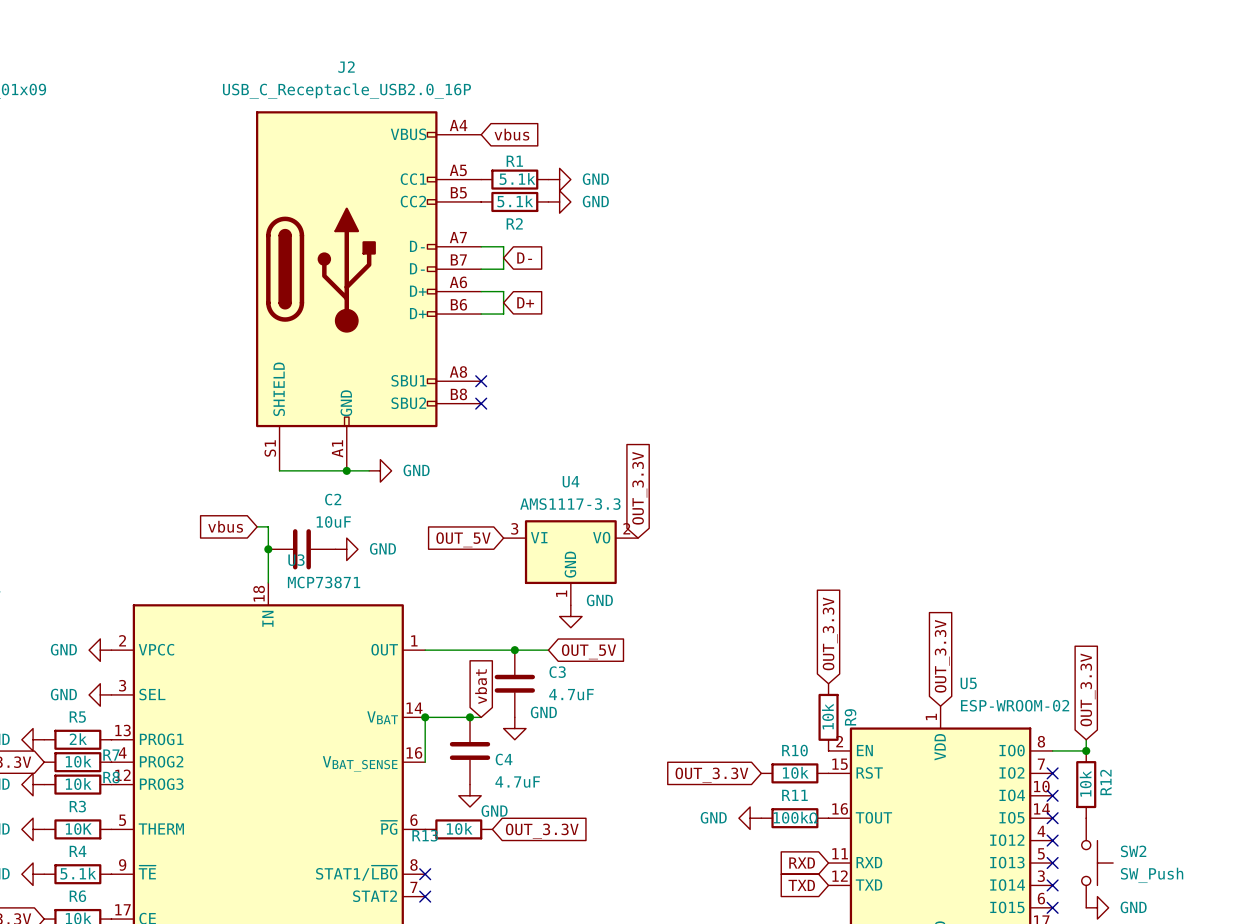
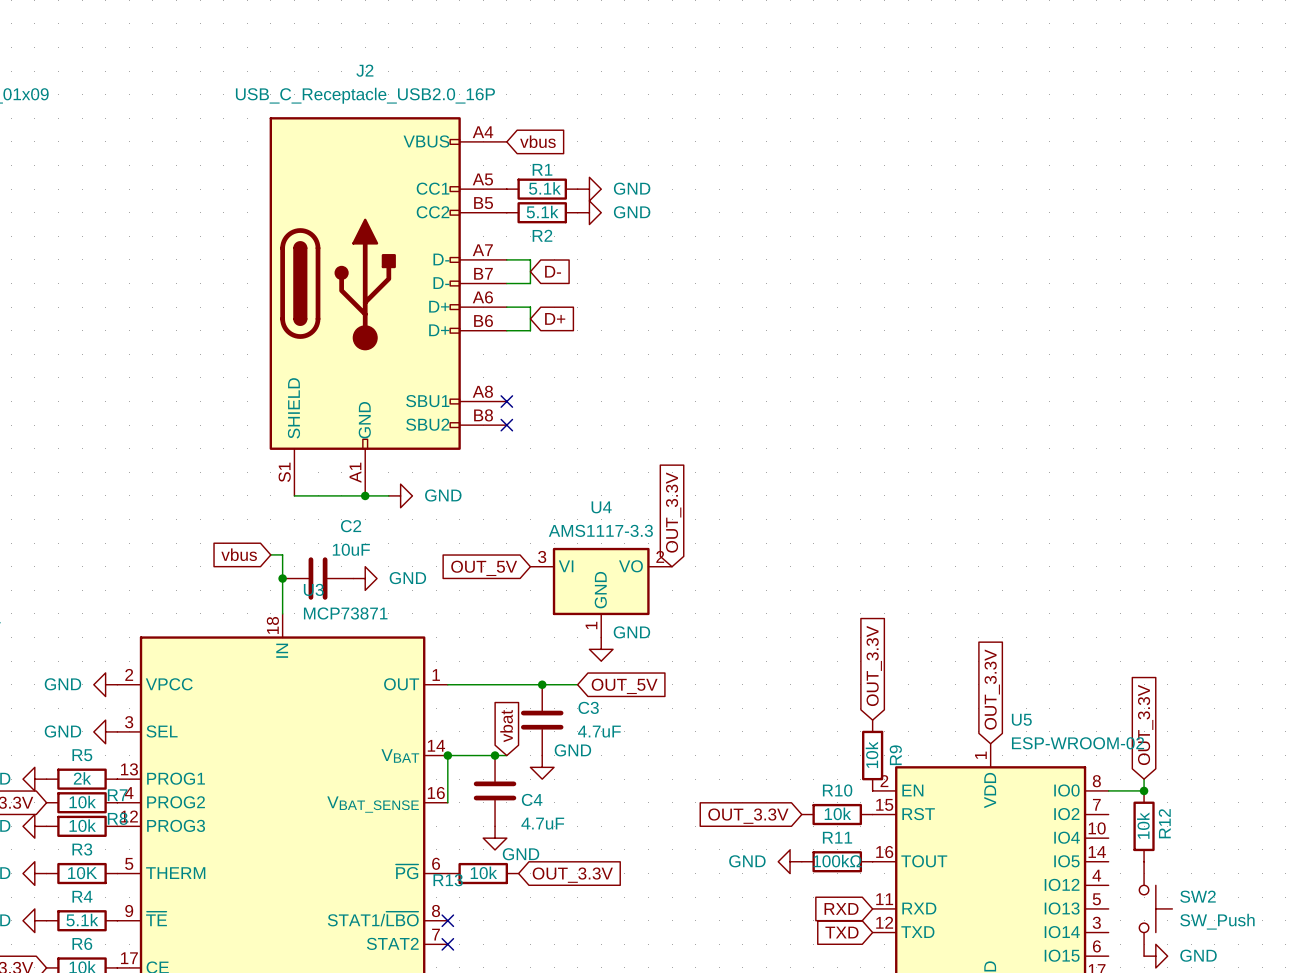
no-connect mark: (1052, 773) -> none
no-connect mark: (1052, 795) -> none
no-connect mark: (1052, 818) -> none
no-connect mark: (1052, 840) -> none
no-connect mark: (1052, 863) -> none
no-connect mark: (1052, 885) -> none
no-connect mark: (1052, 907) -> none

